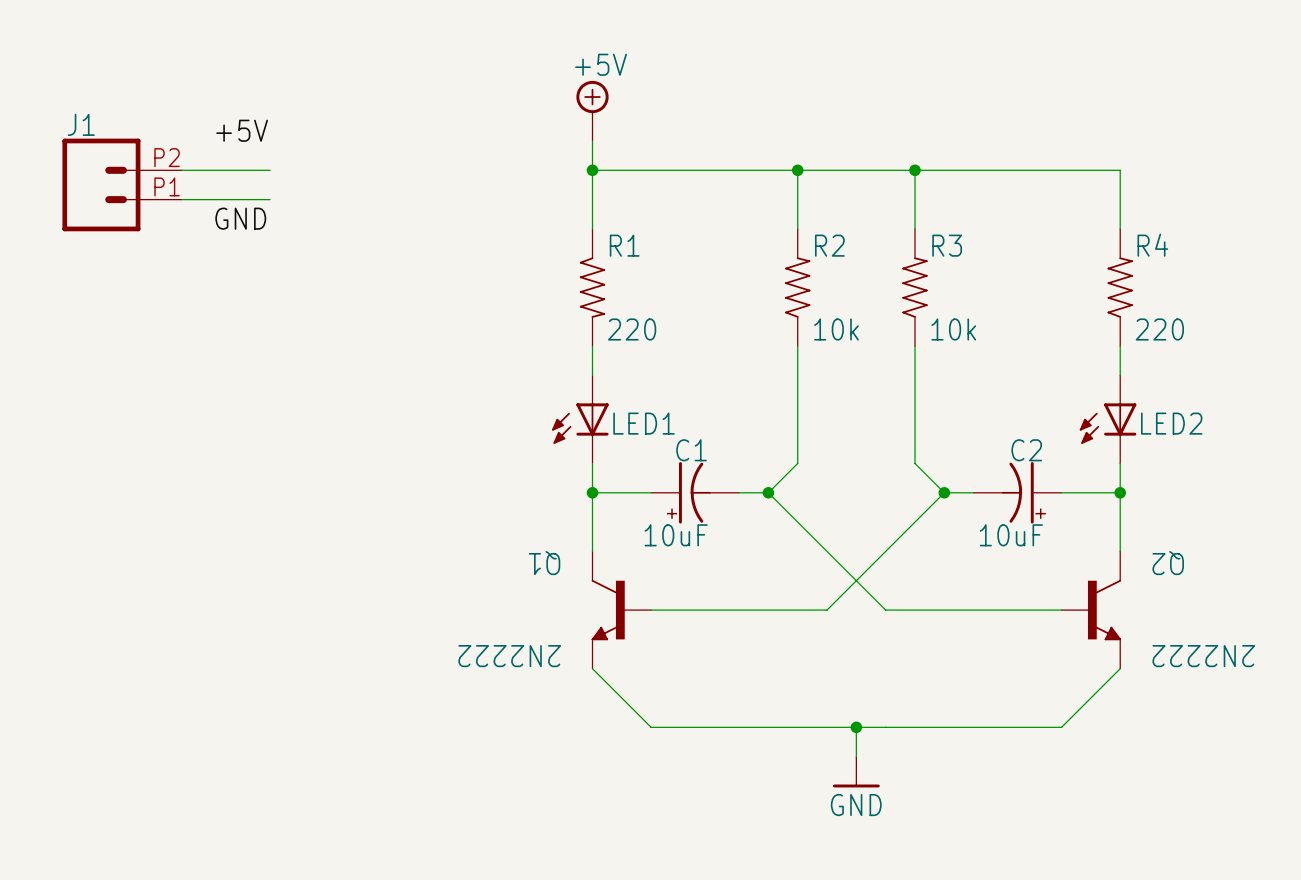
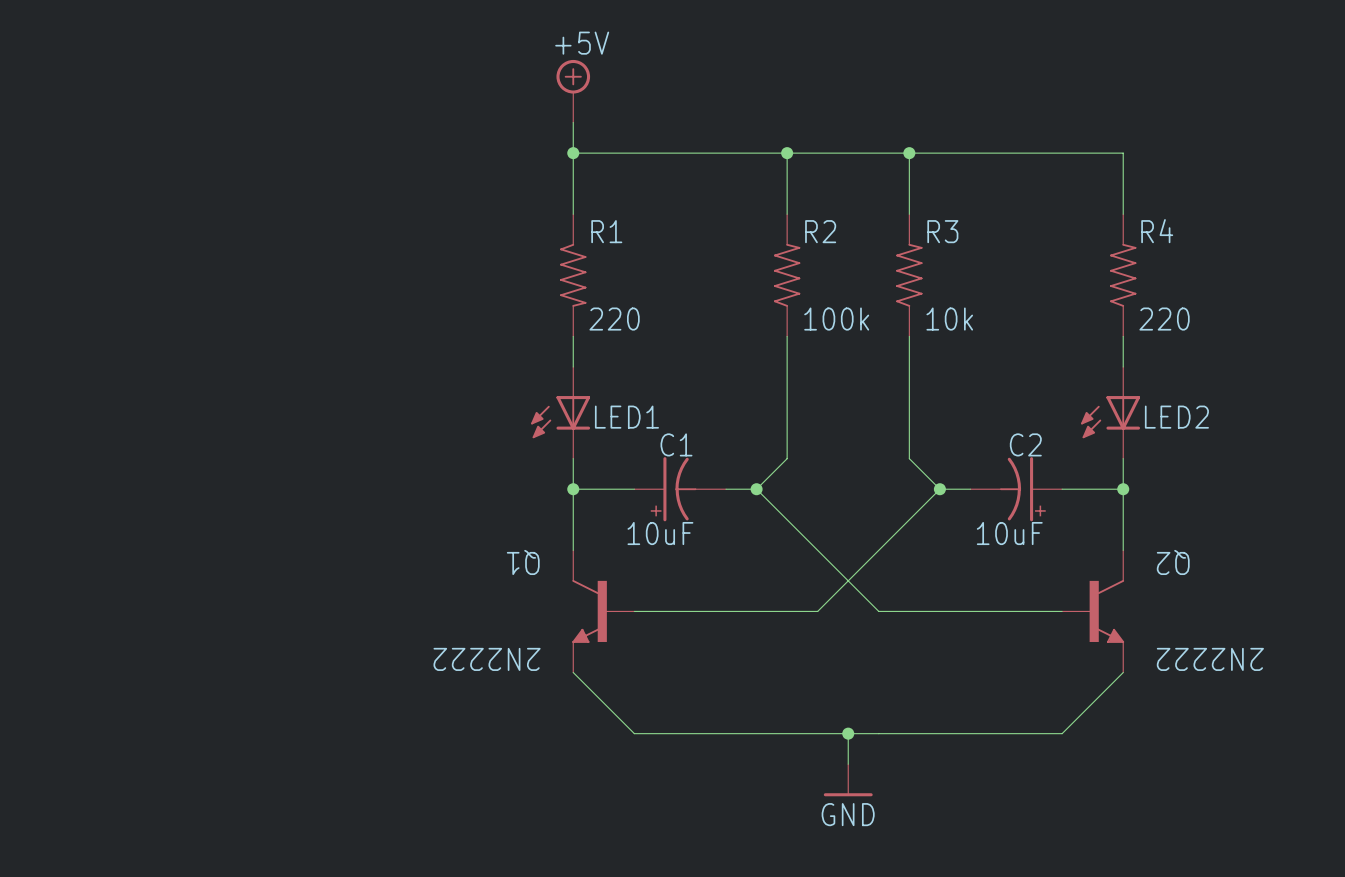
label: +5V (242, 130) -> none
wire: (182, 170) (270, 170) -> none
J1: (122, 184) -> none
wire: (182, 199) (270, 199) -> none
label: GND (240, 218) -> none
R2 value: 10k (836, 329) -> 100k (836, 319)

